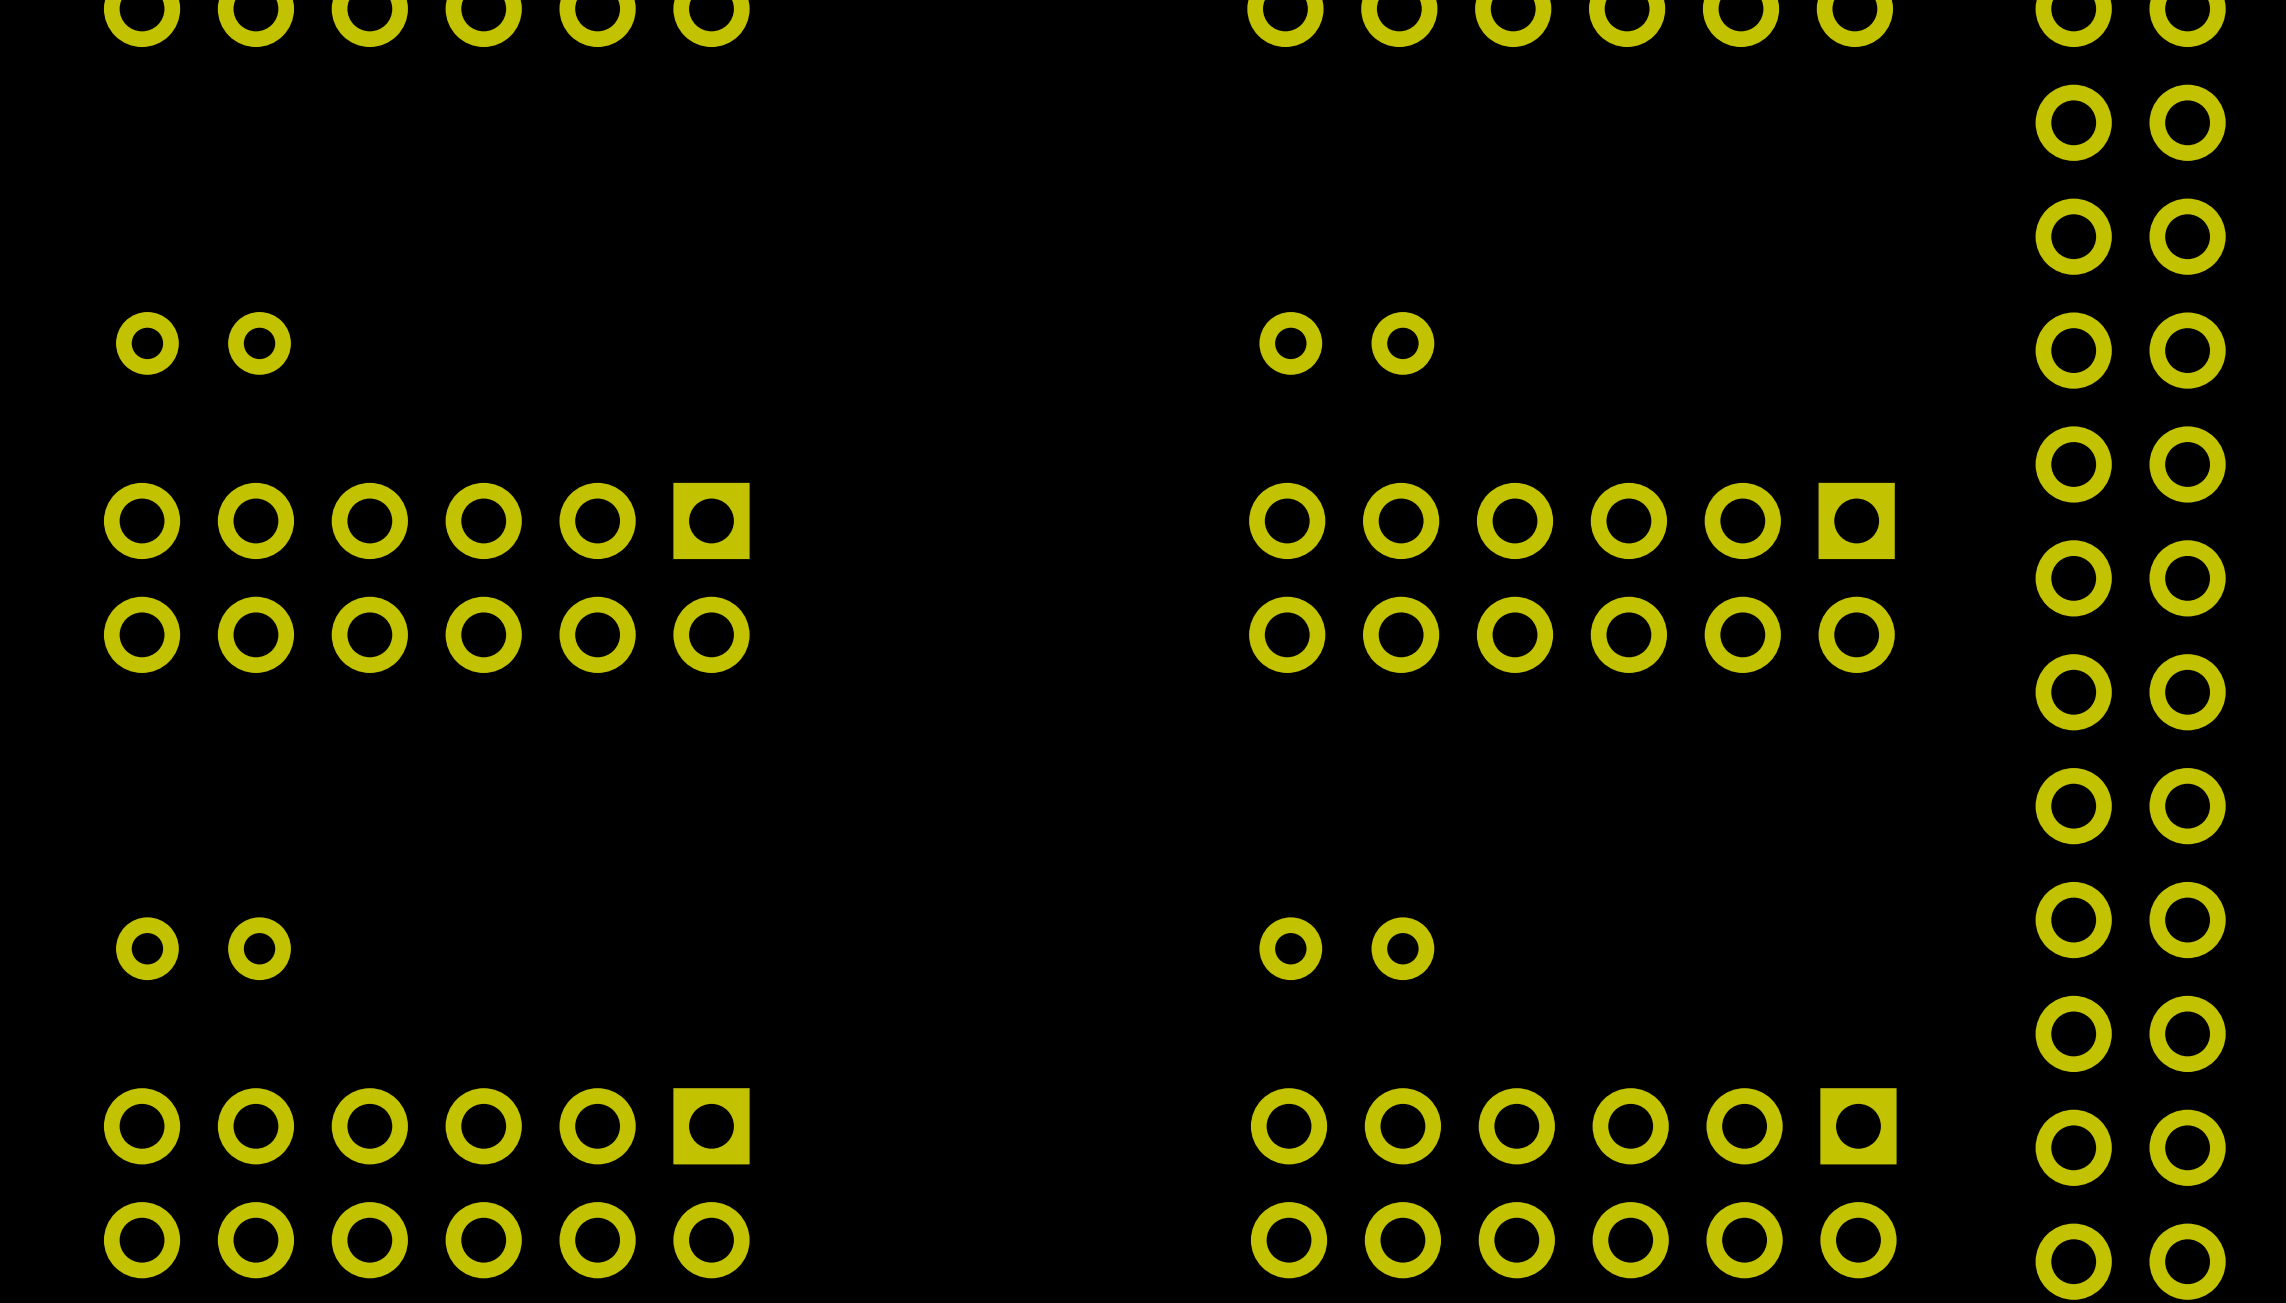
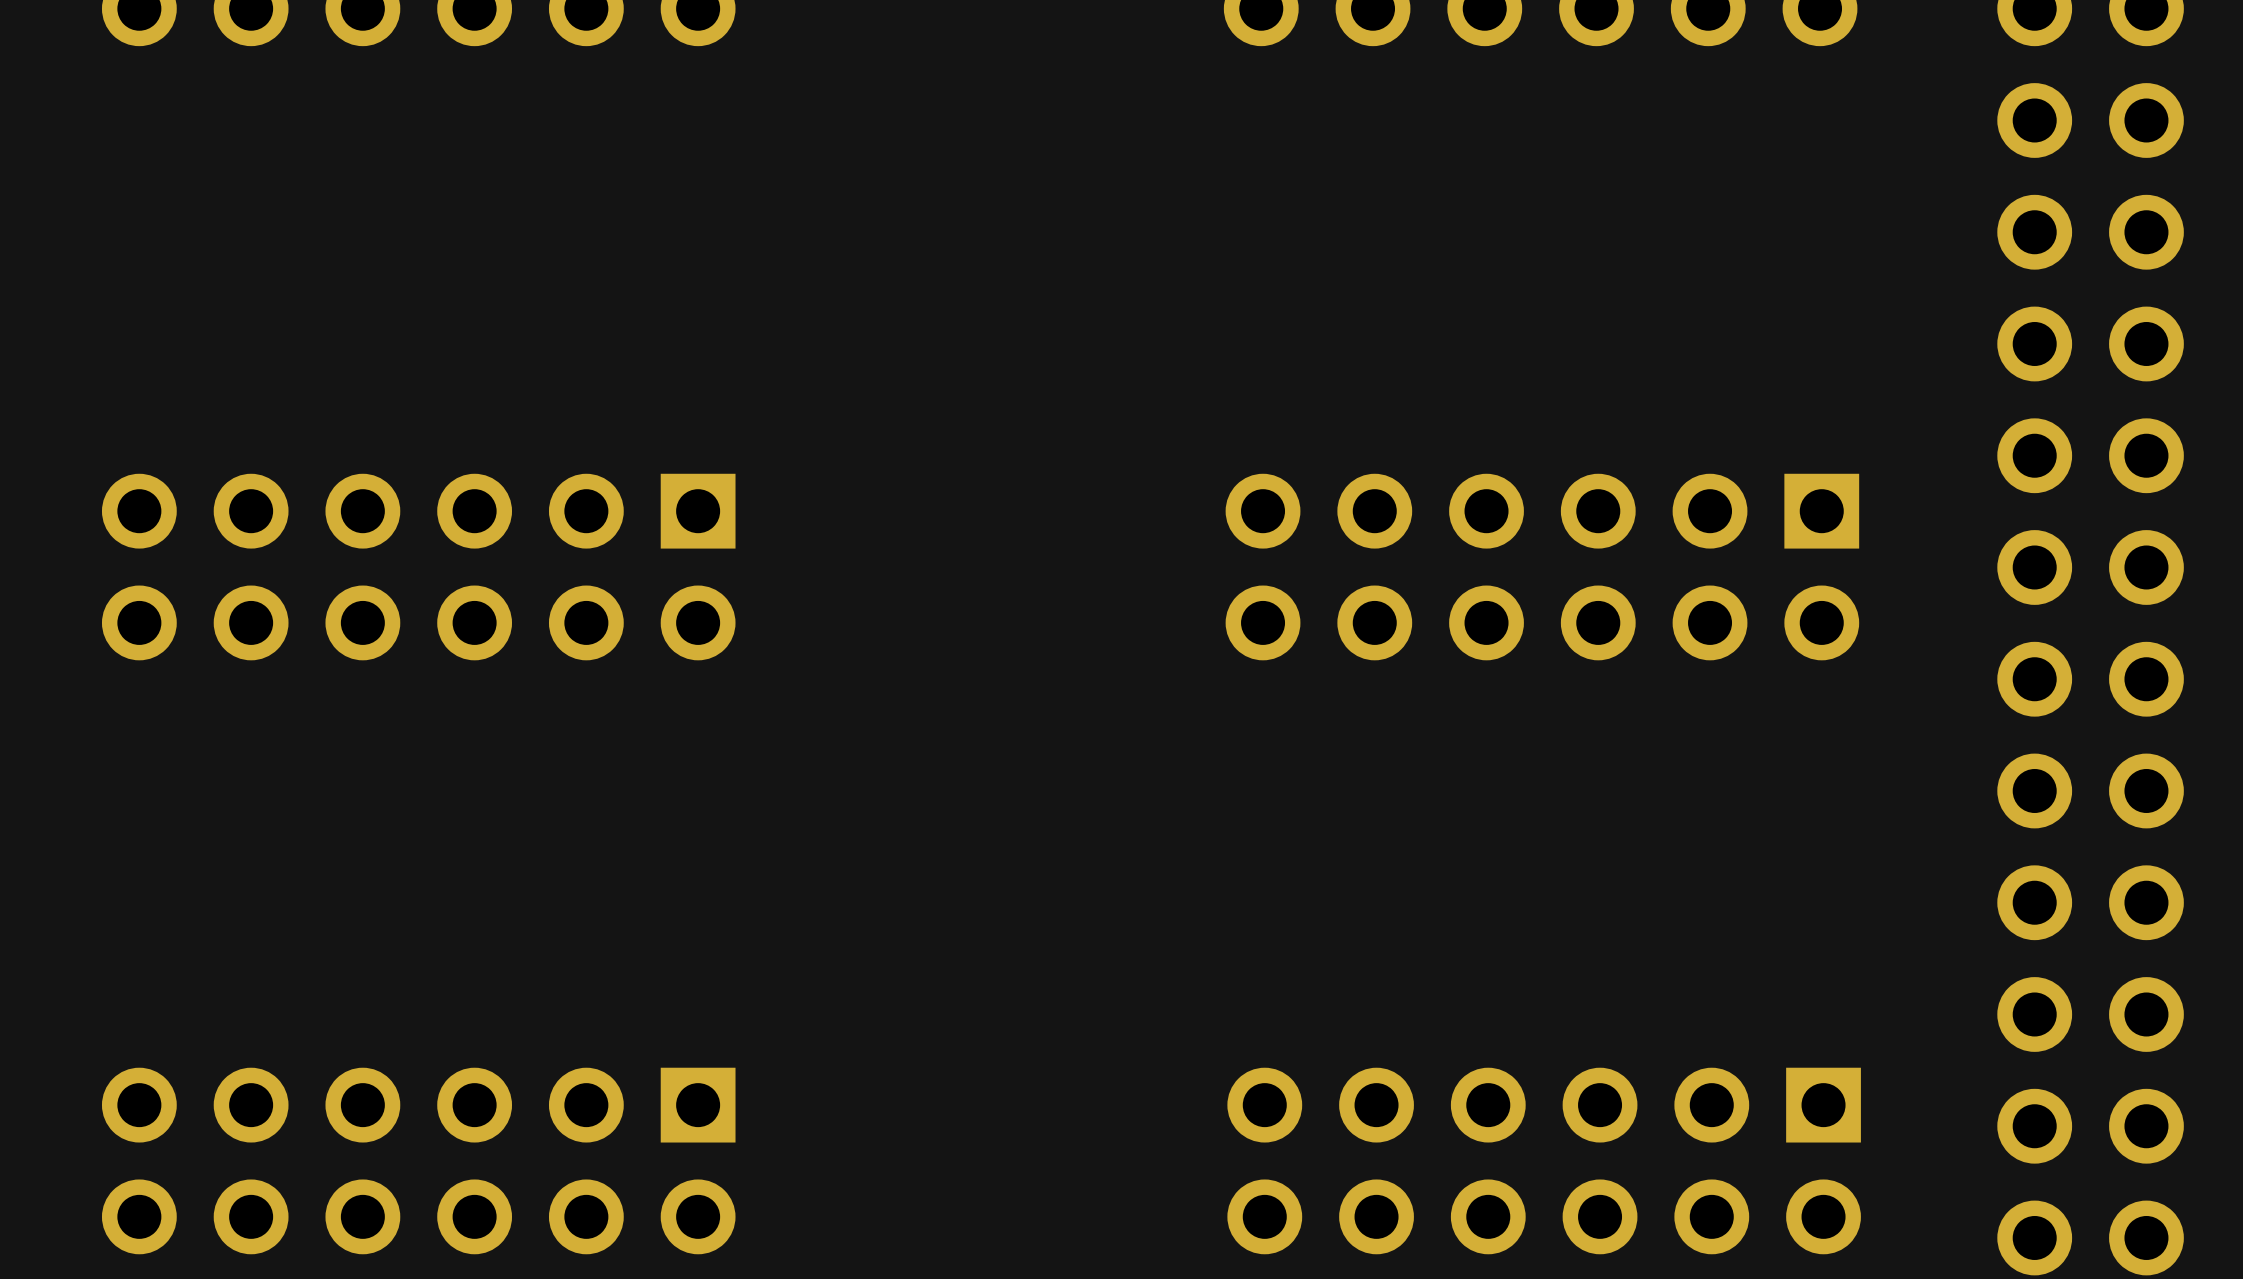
part: (203, 343) -> none
part: (1346, 343) -> none
part: (203, 948) -> none
part: (1346, 948) -> none

